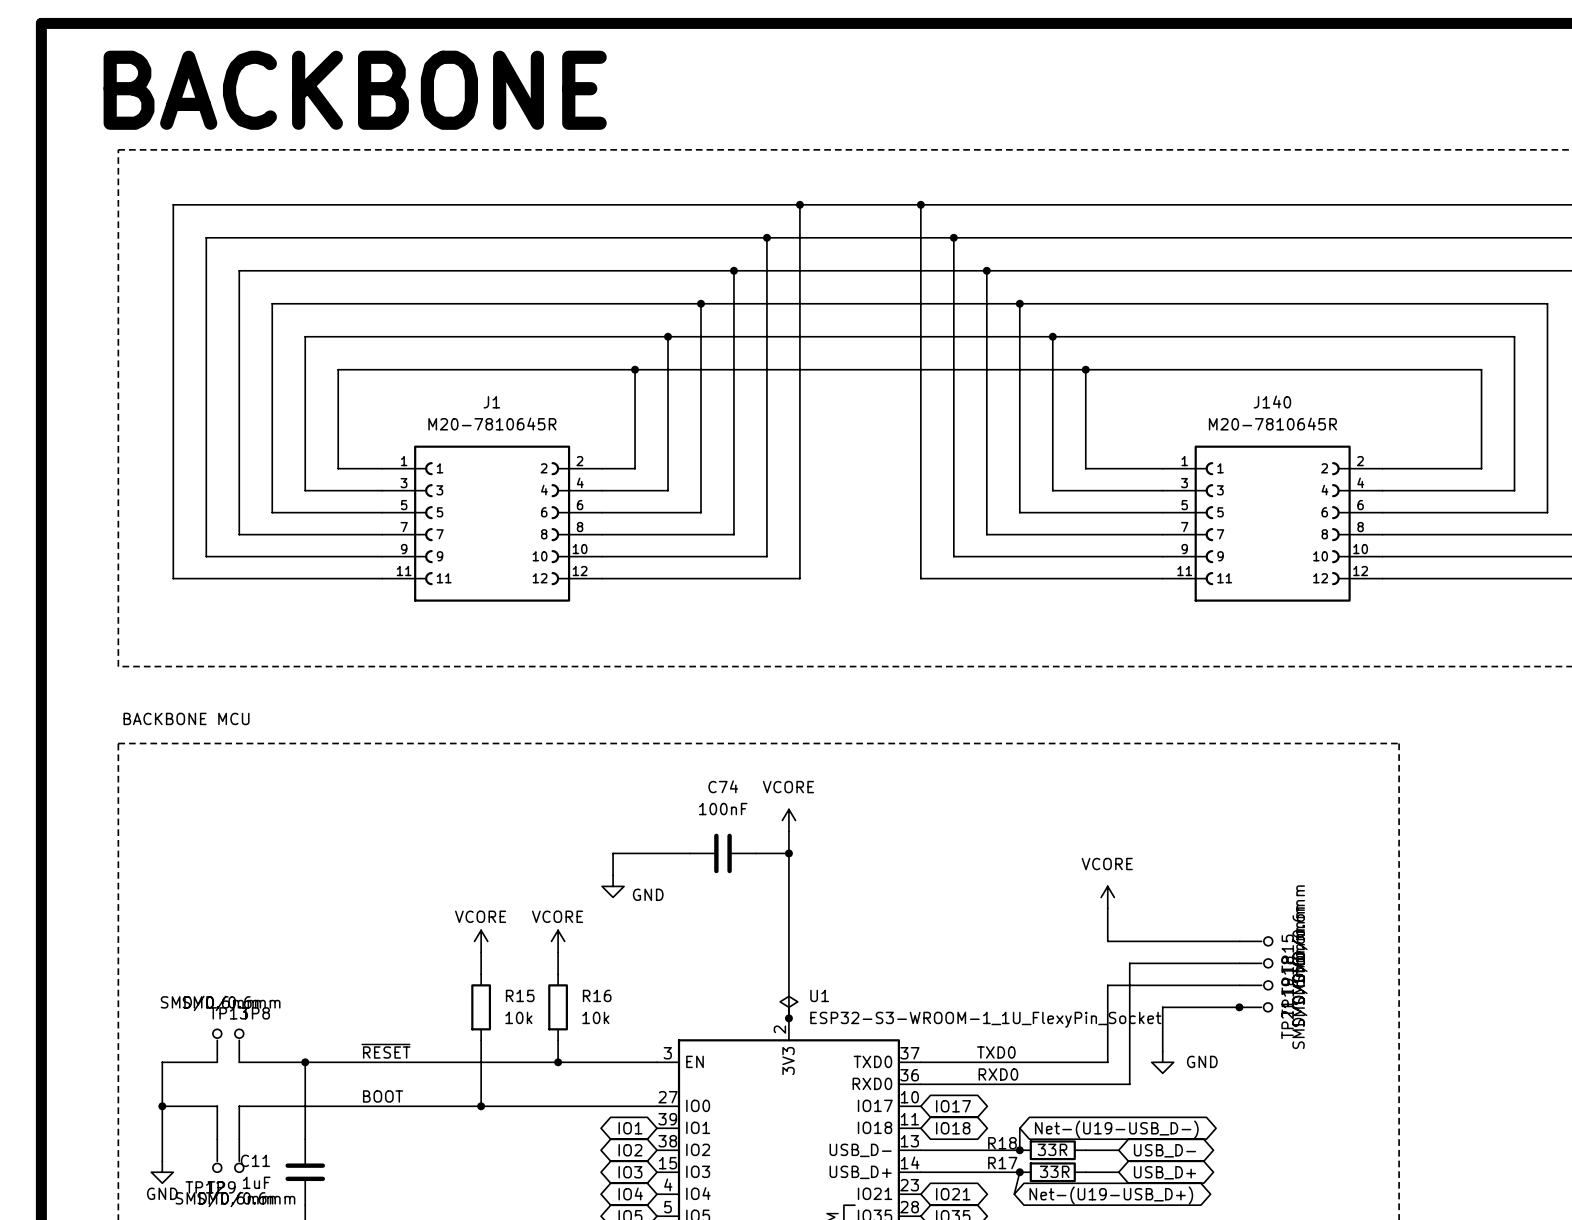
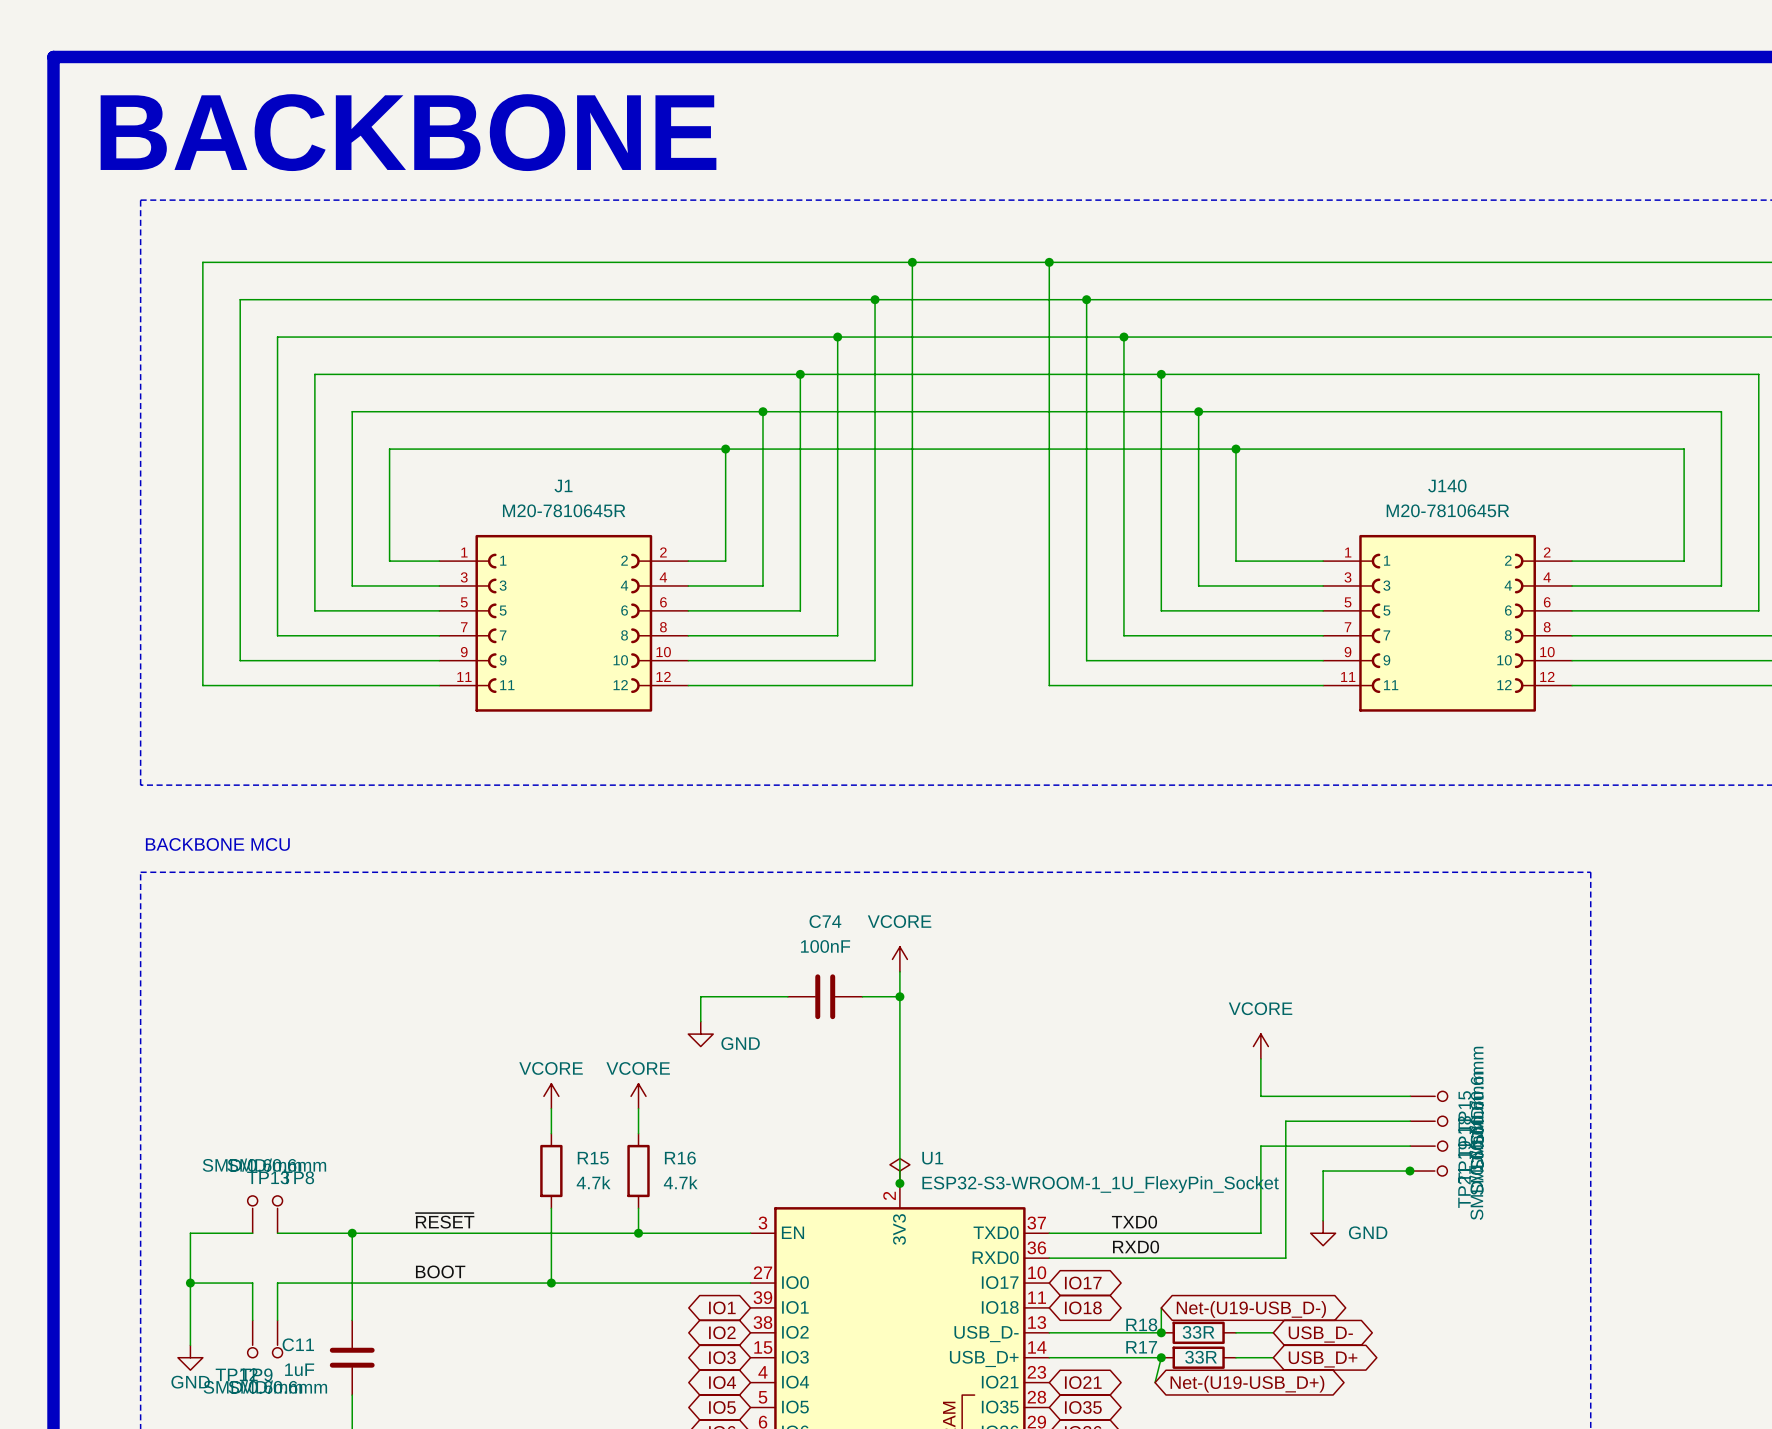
R15 value: 10k (518, 1017) -> 4.7k (593, 1182)
R16 value: 10k (595, 1017) -> 4.7k (680, 1182)

